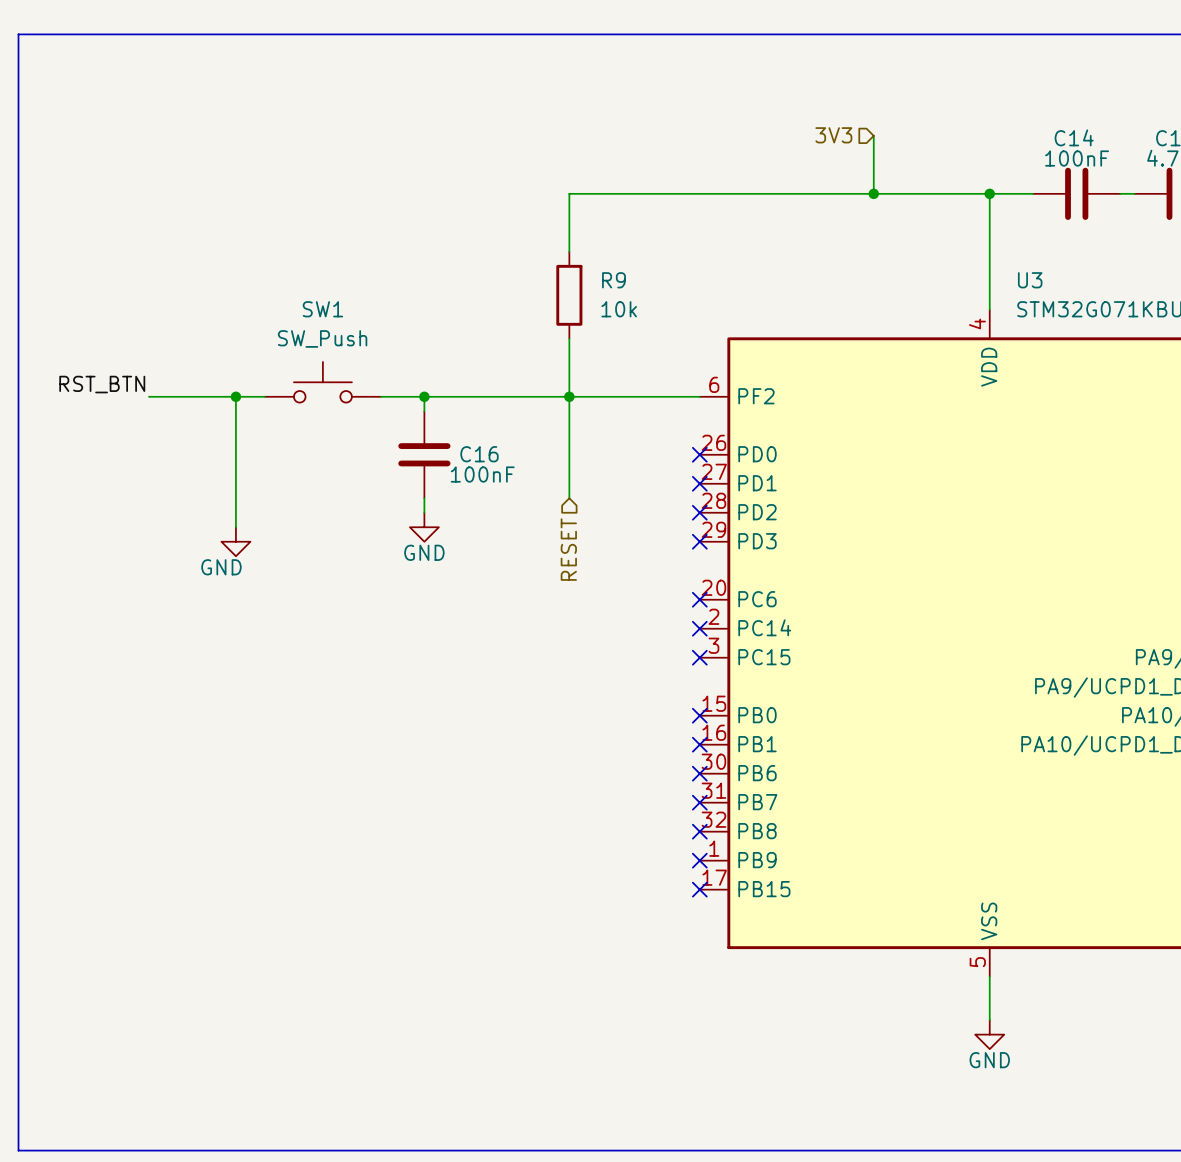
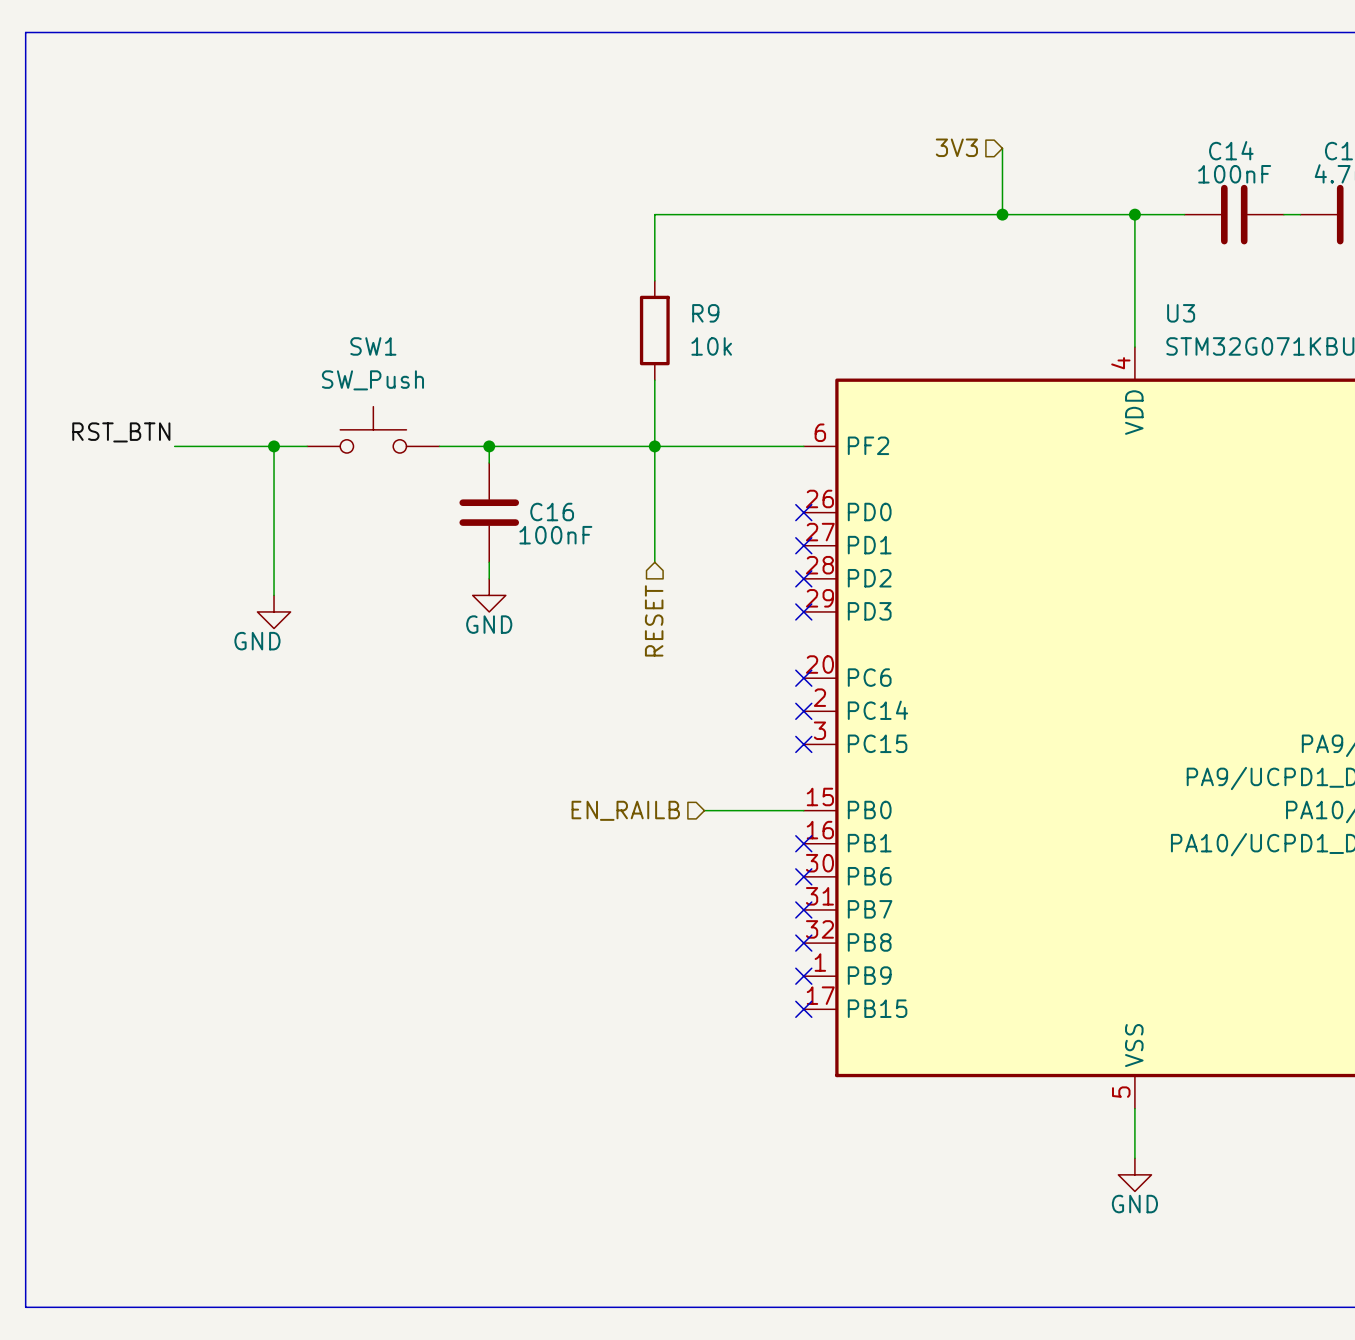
hierarchical label: none -> EN_RAILB (625, 810)
wire: none -> (704, 810) (803, 810)
no-connect mark: (699, 715) -> none

